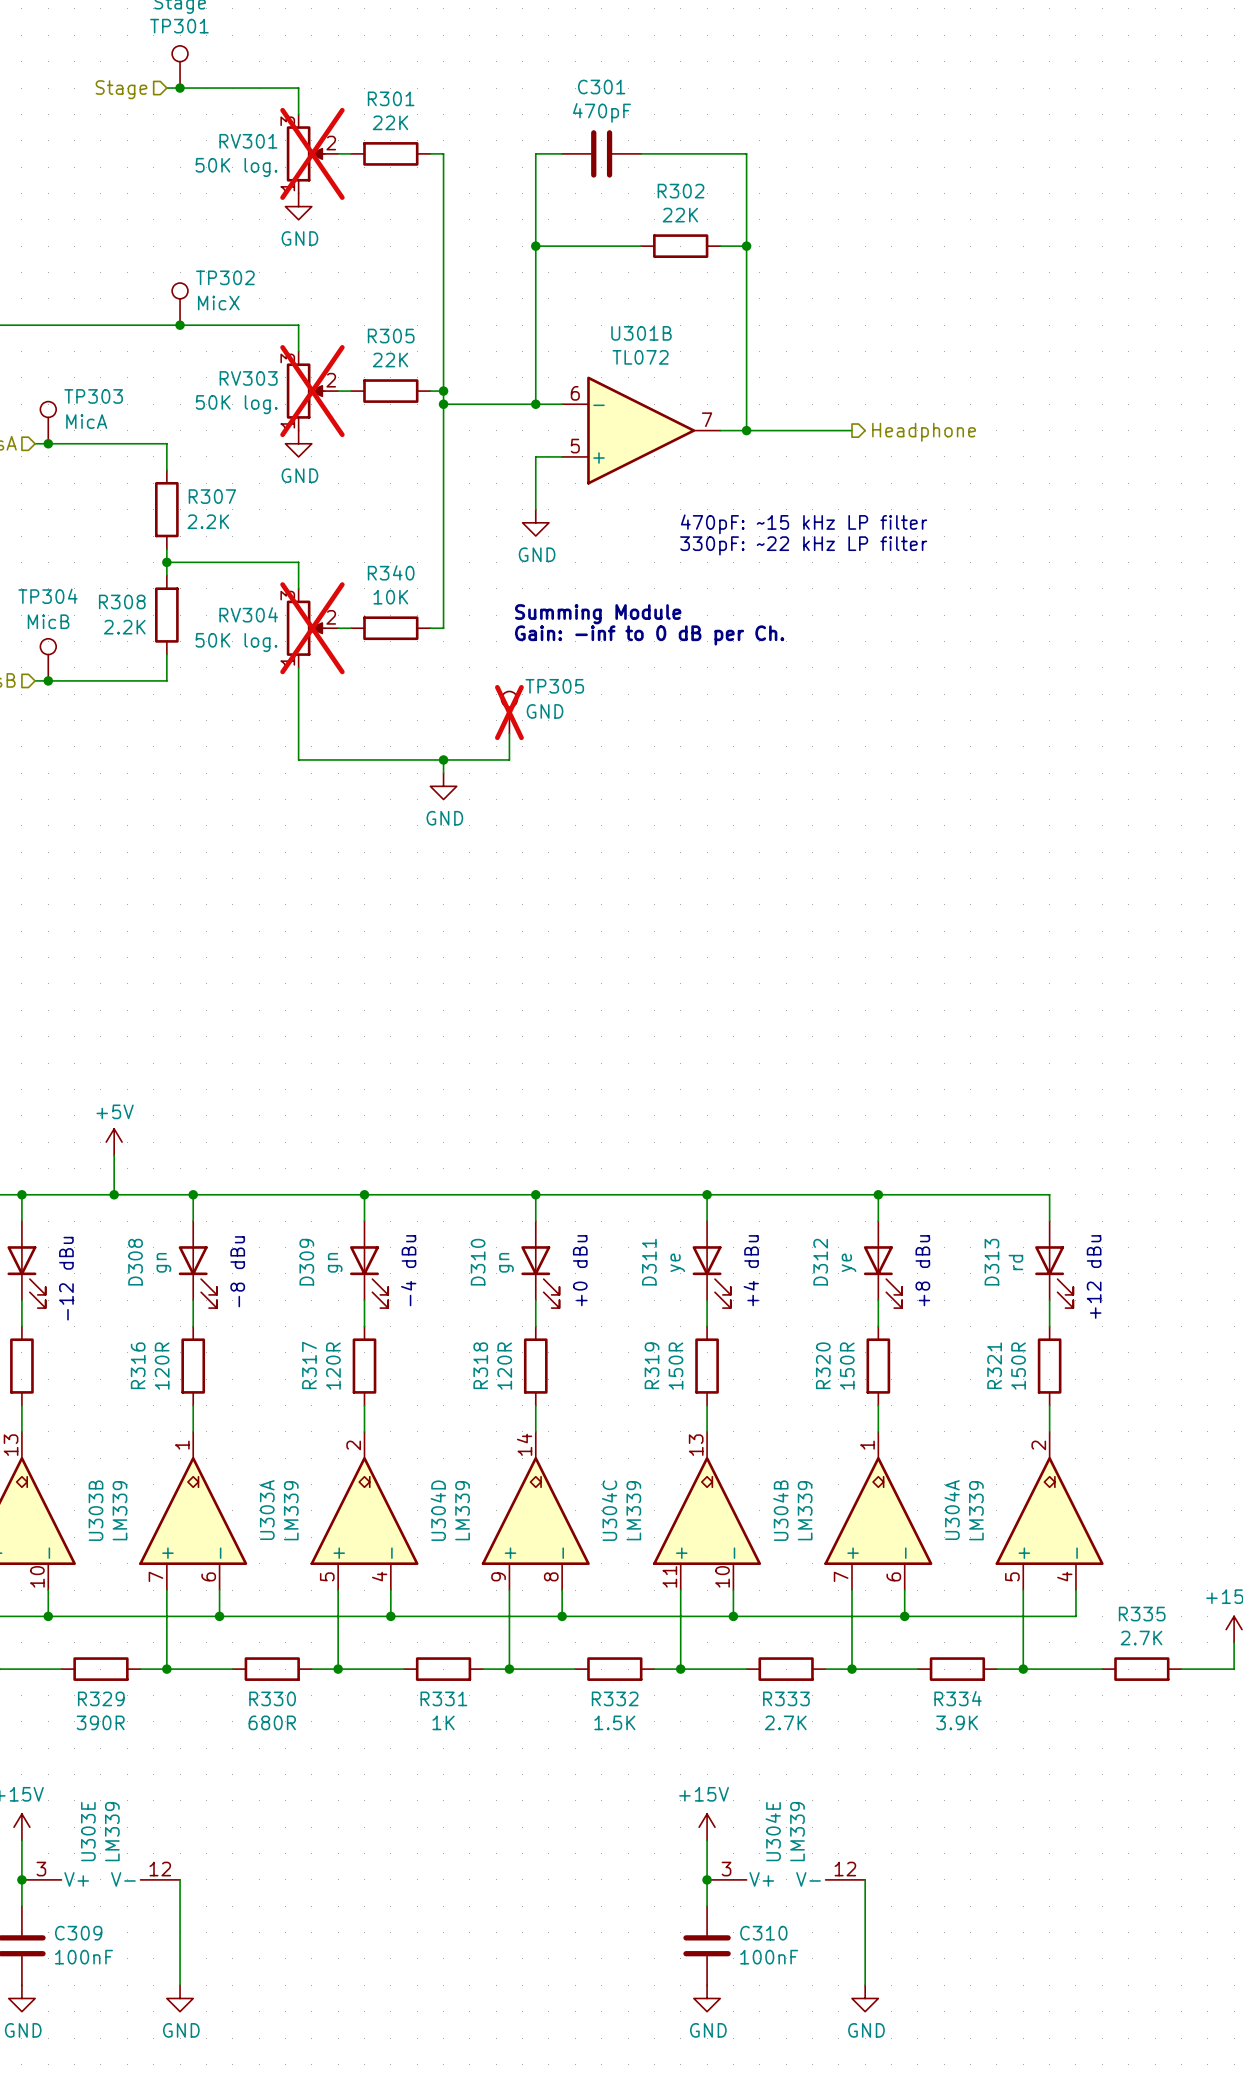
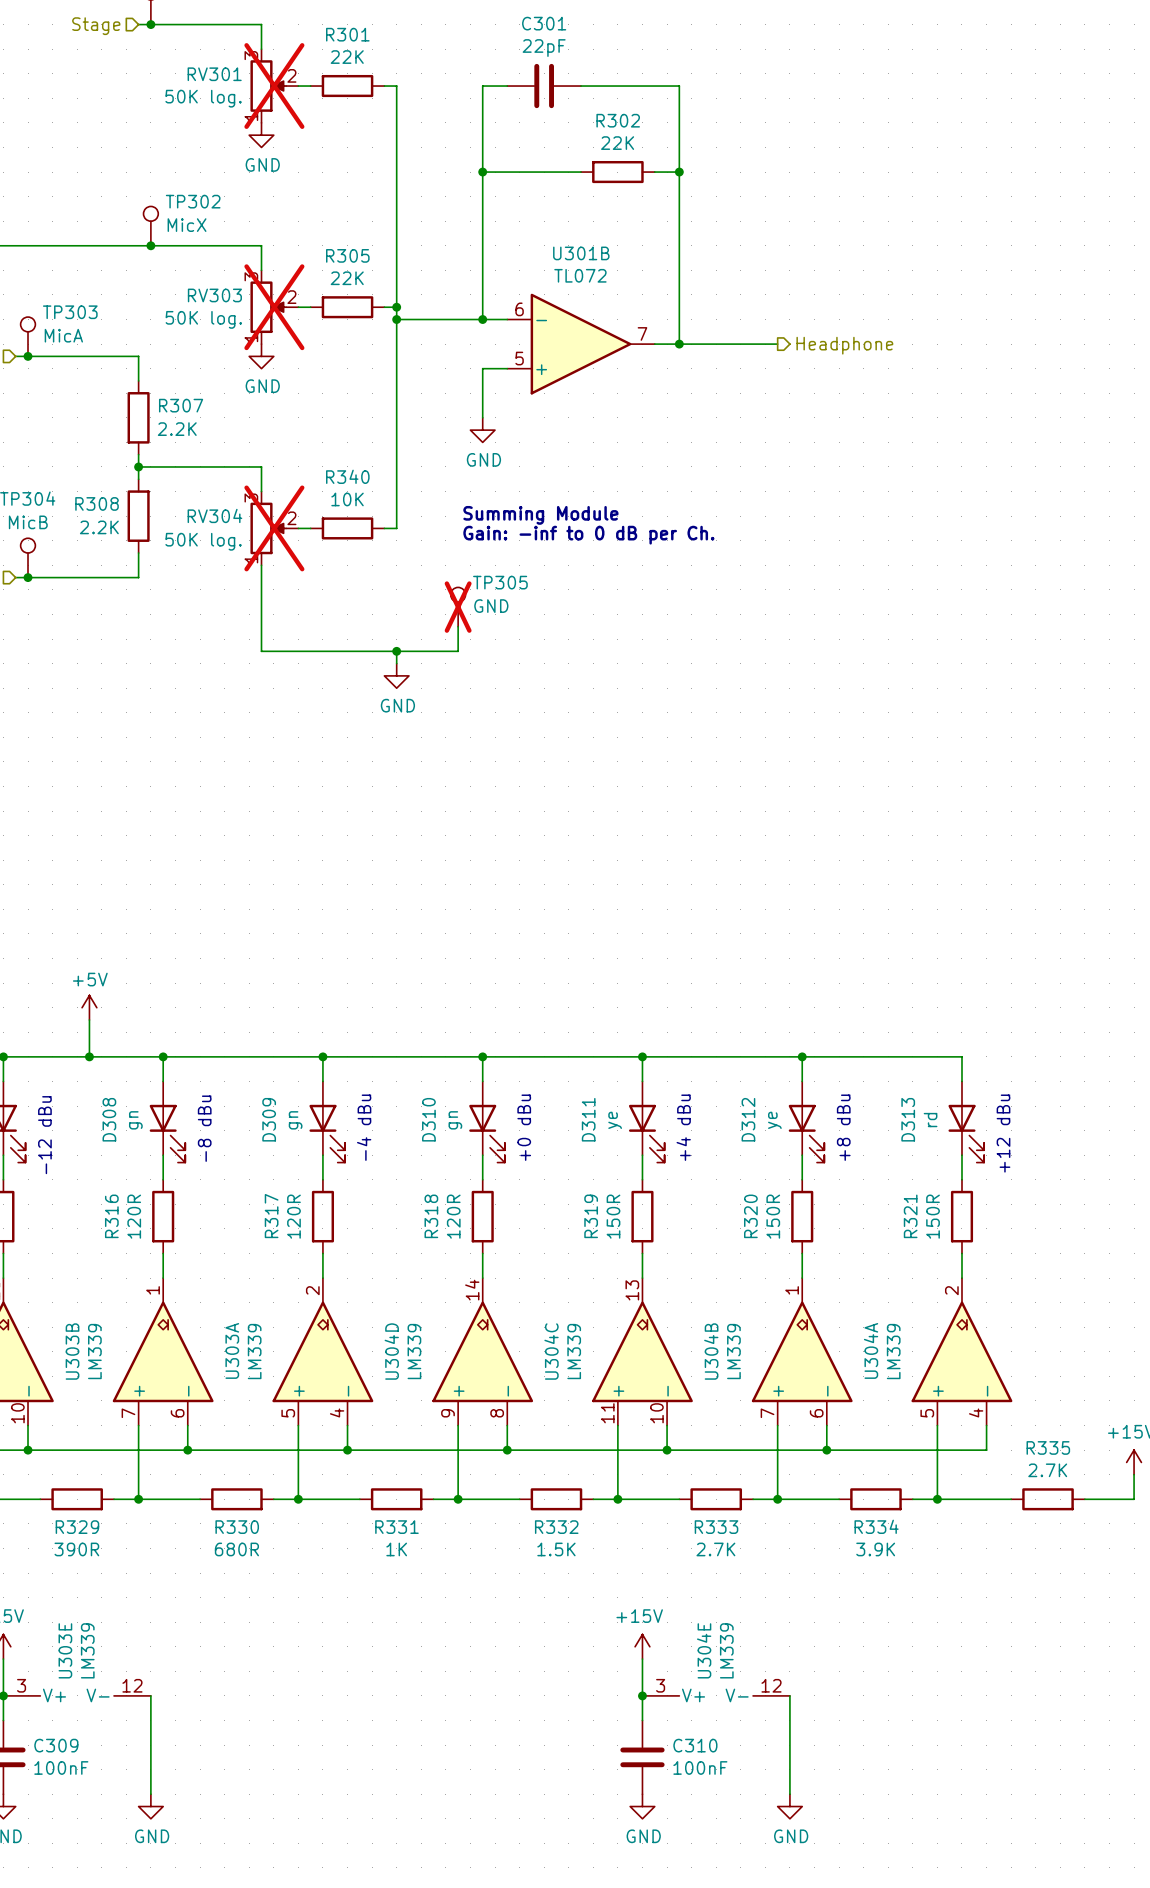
C301 value: 470pF (601, 112) -> 22pF (544, 48)
text: 470pF: ~15 kHz LP filter (804, 524) -> none
text: 330pF: ~22 kHz LP filter (803, 545) -> none

